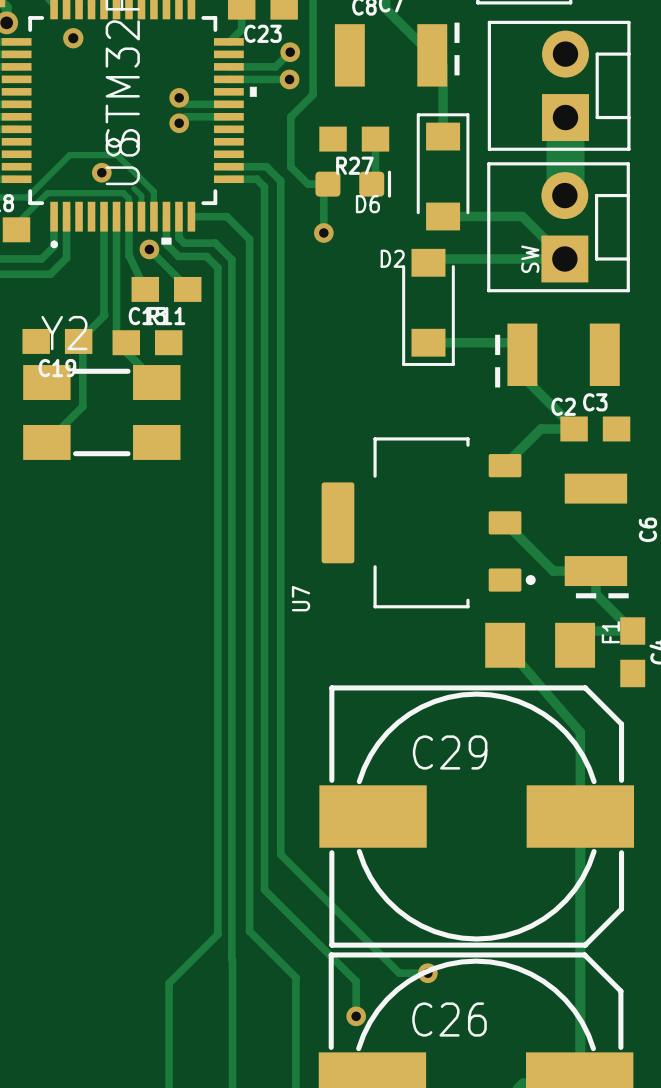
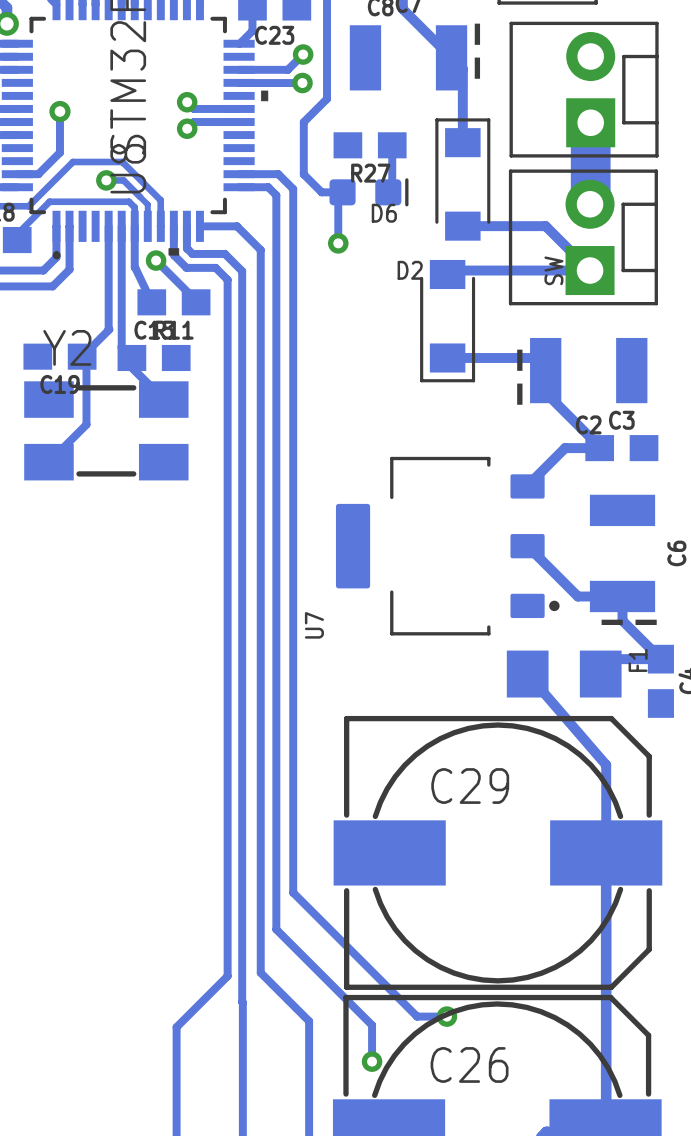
via: (73, 38) -> none
track: none -> (59, 111) (59, 152) (38, 174) (17, 174)
via: none -> (59, 111)
track: none -> (106, 180) (123, 180) (140, 196)

